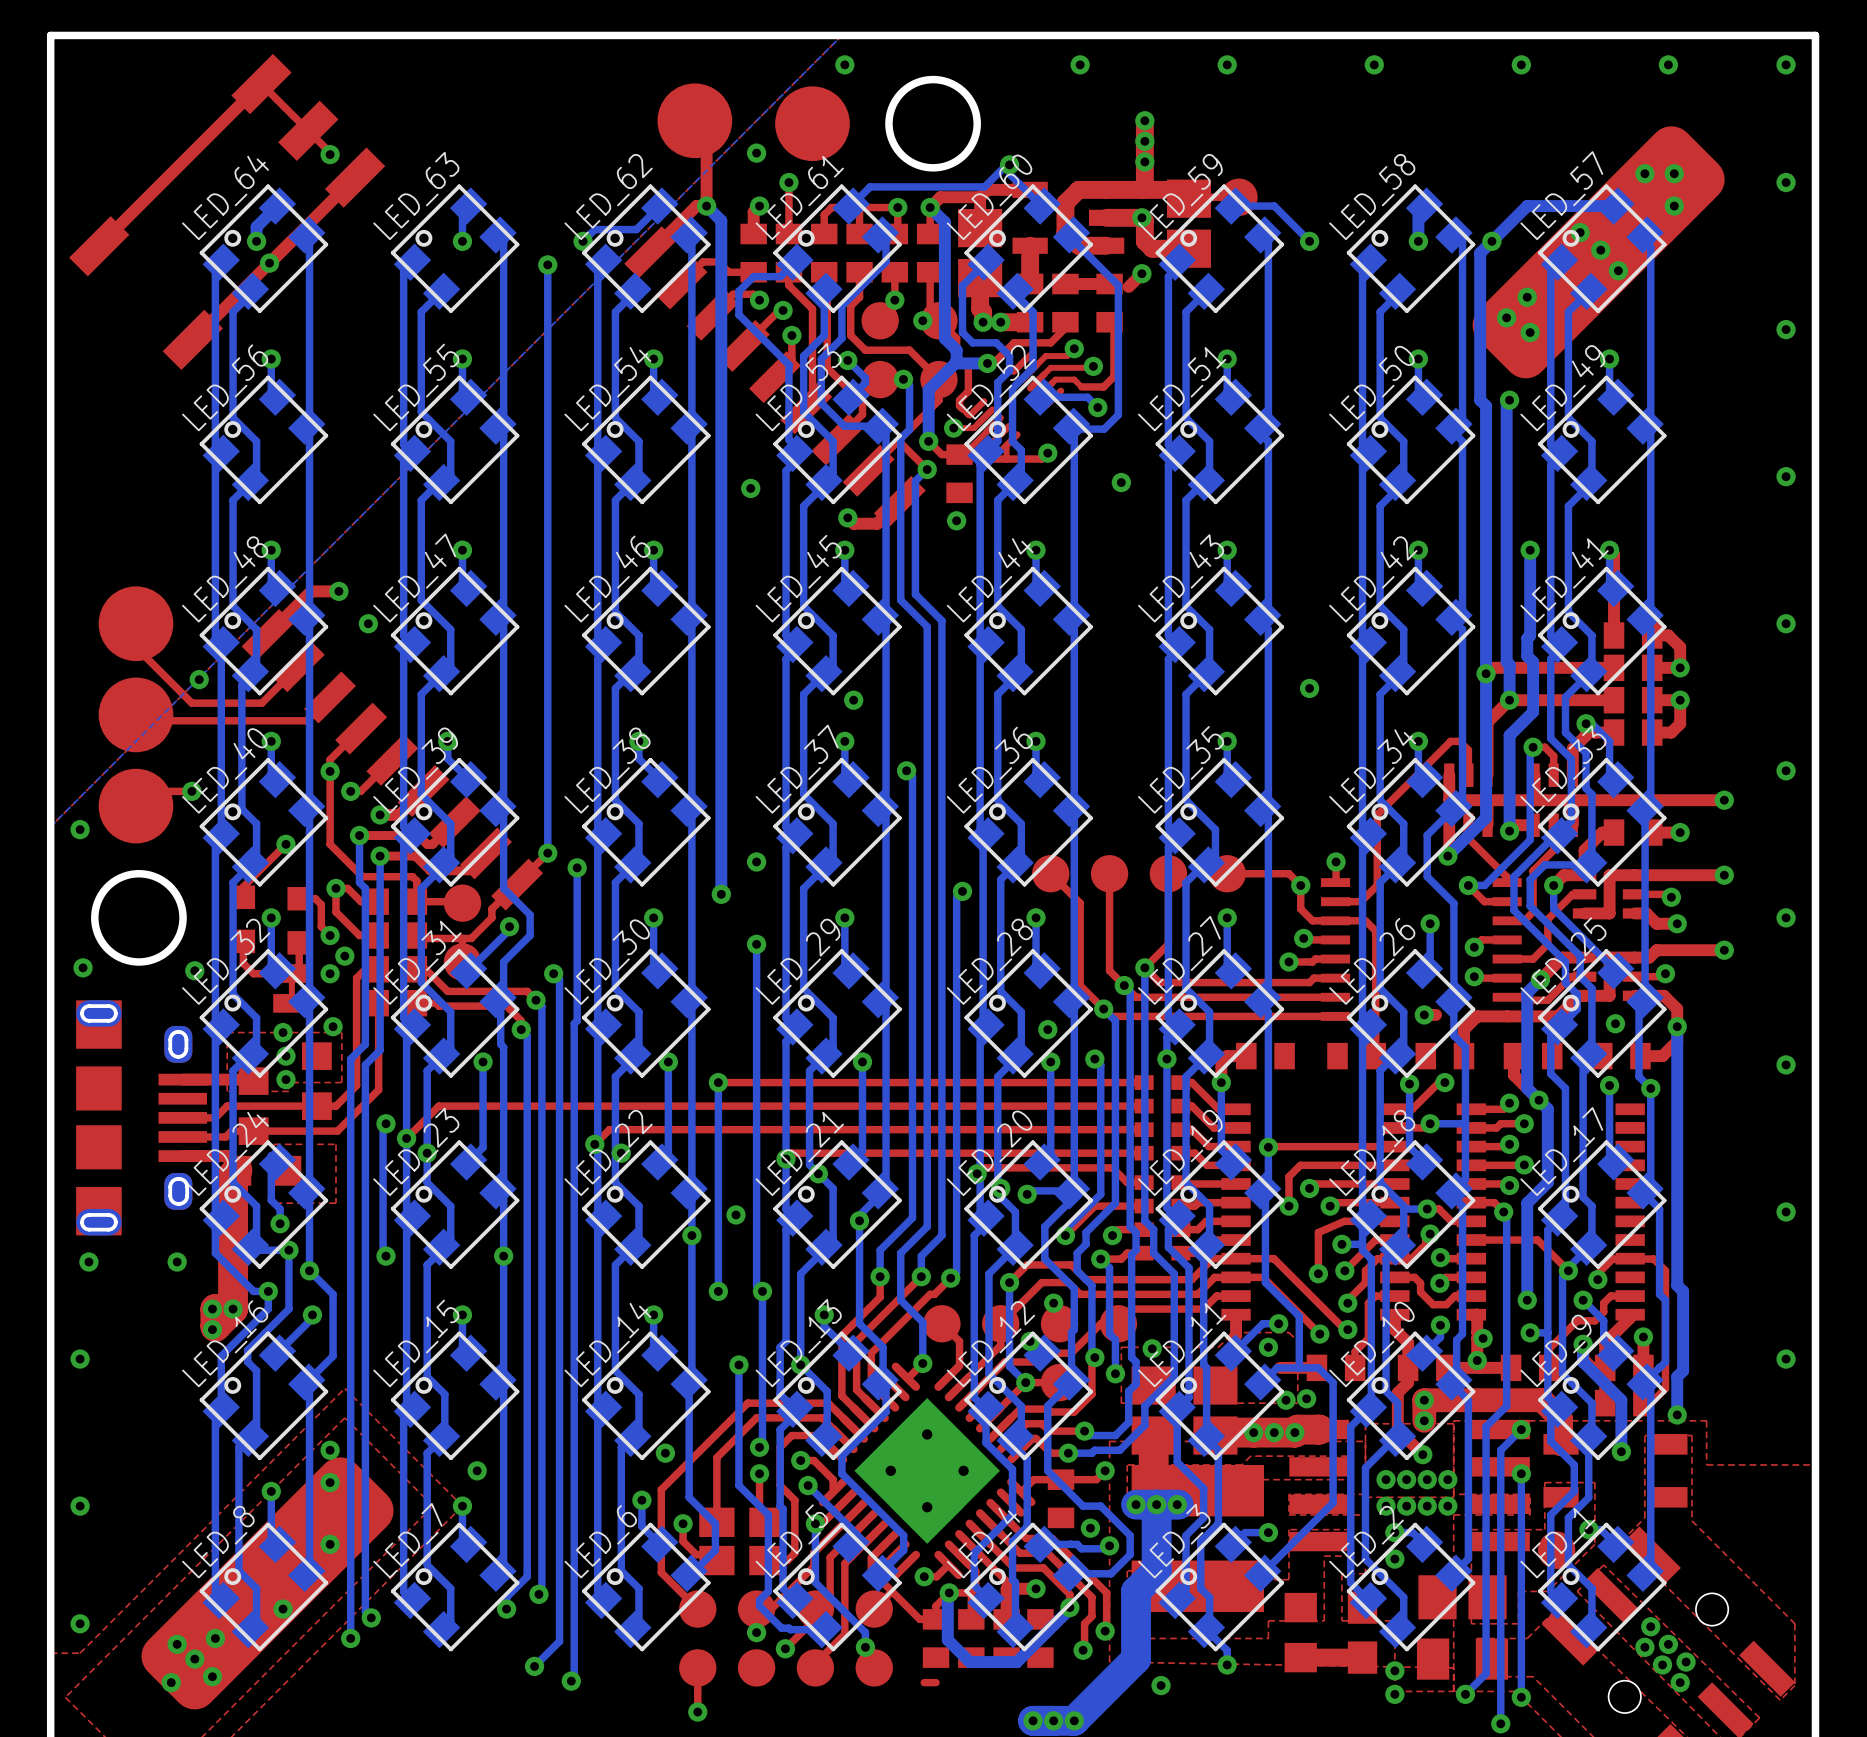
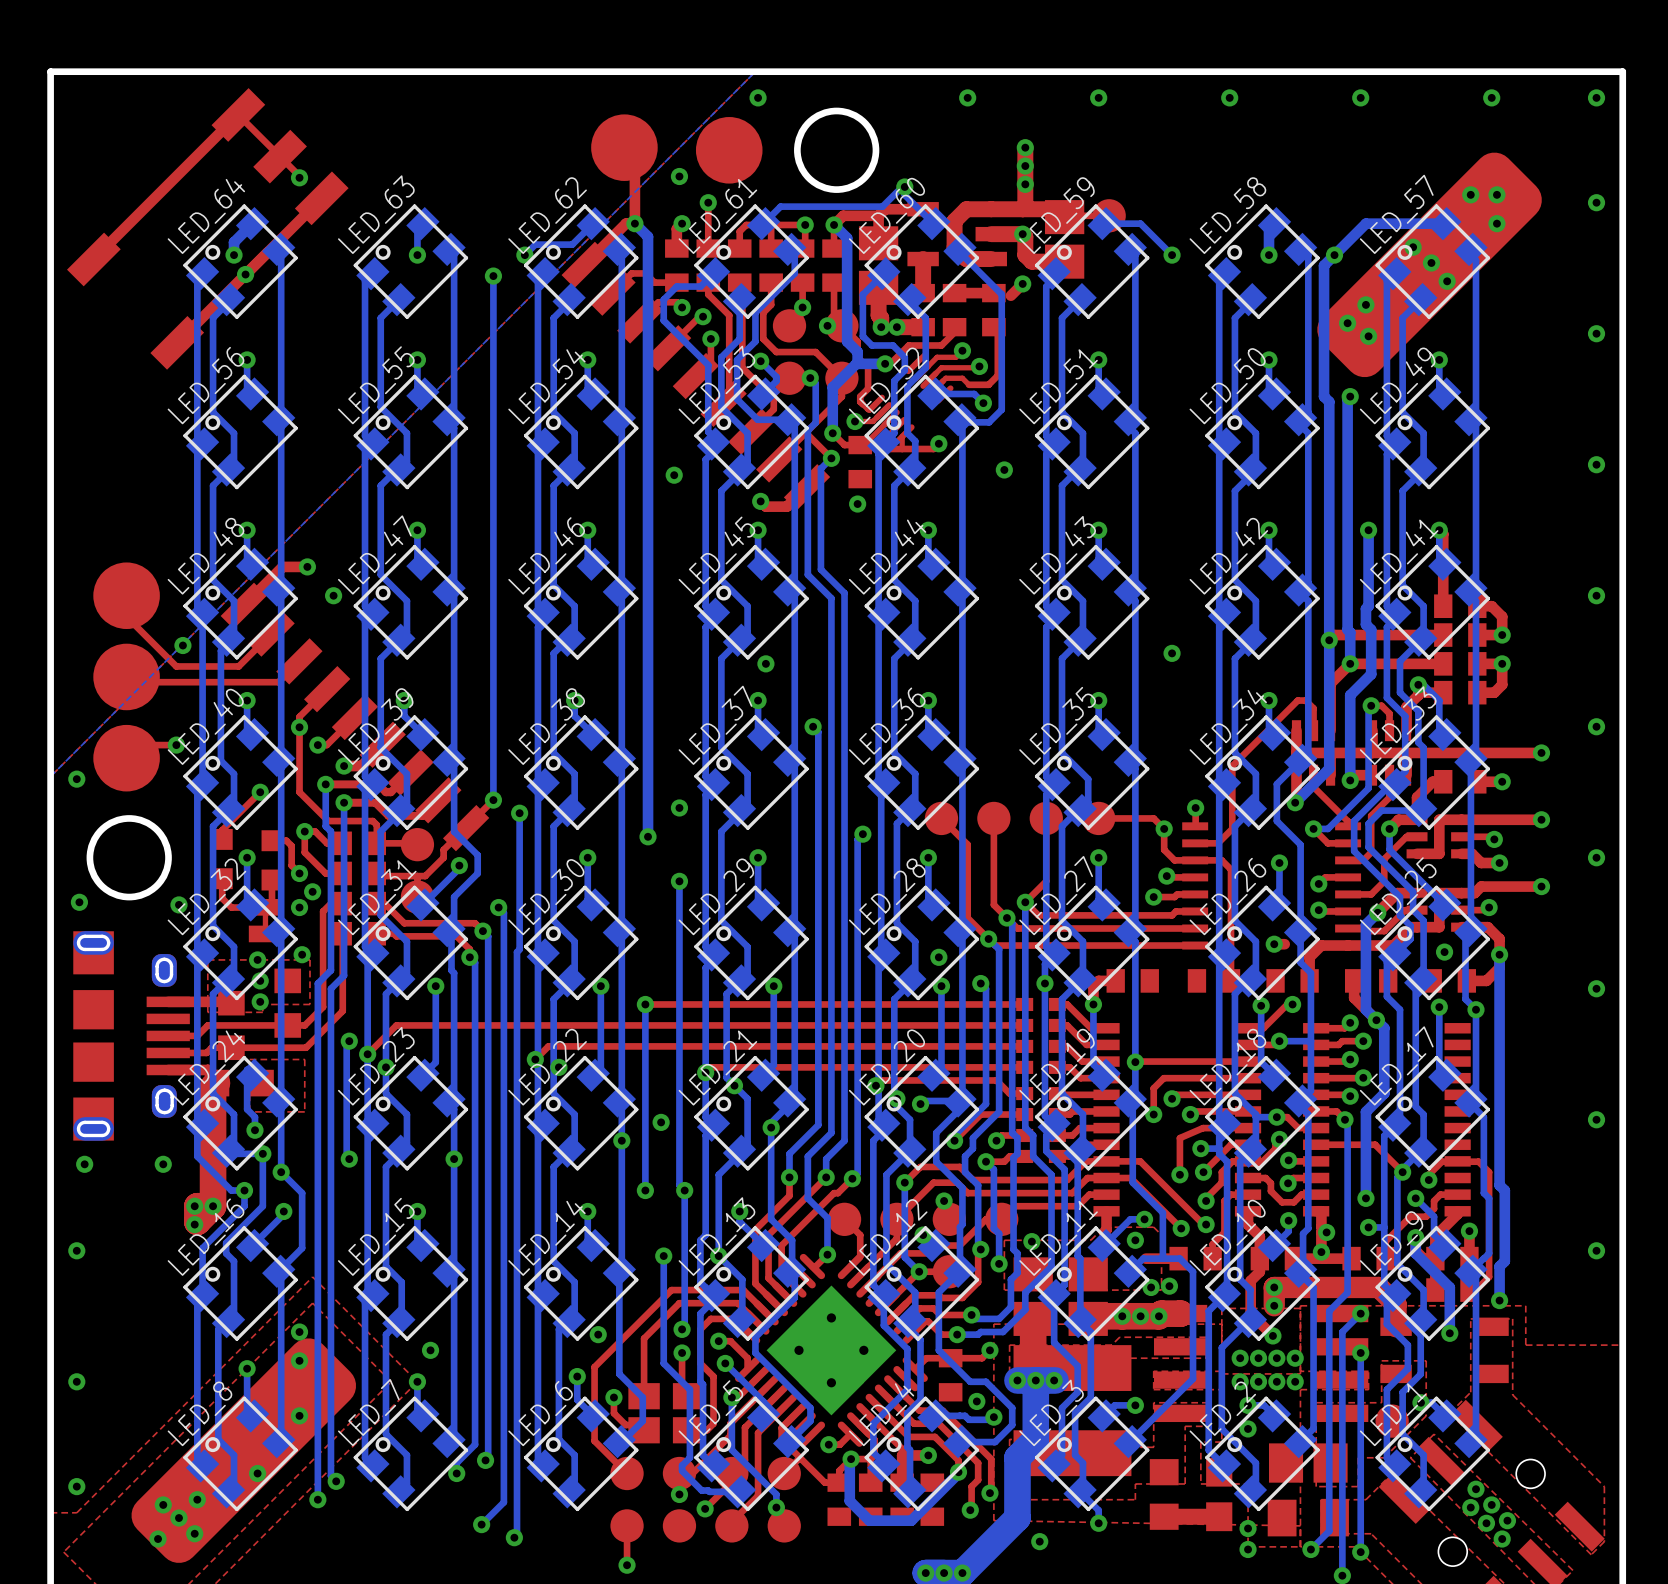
top track: (936, 1682) (924, 1682) -> none

